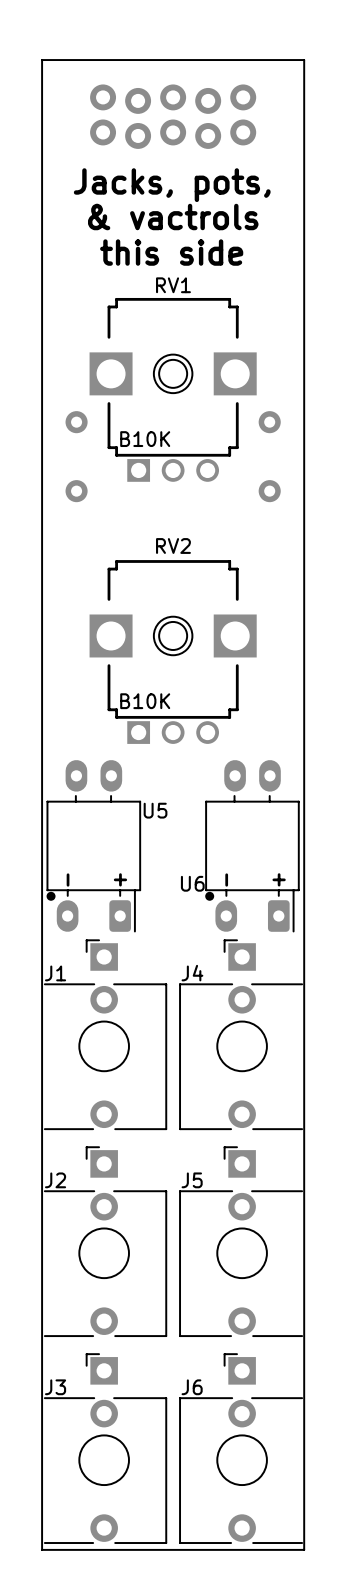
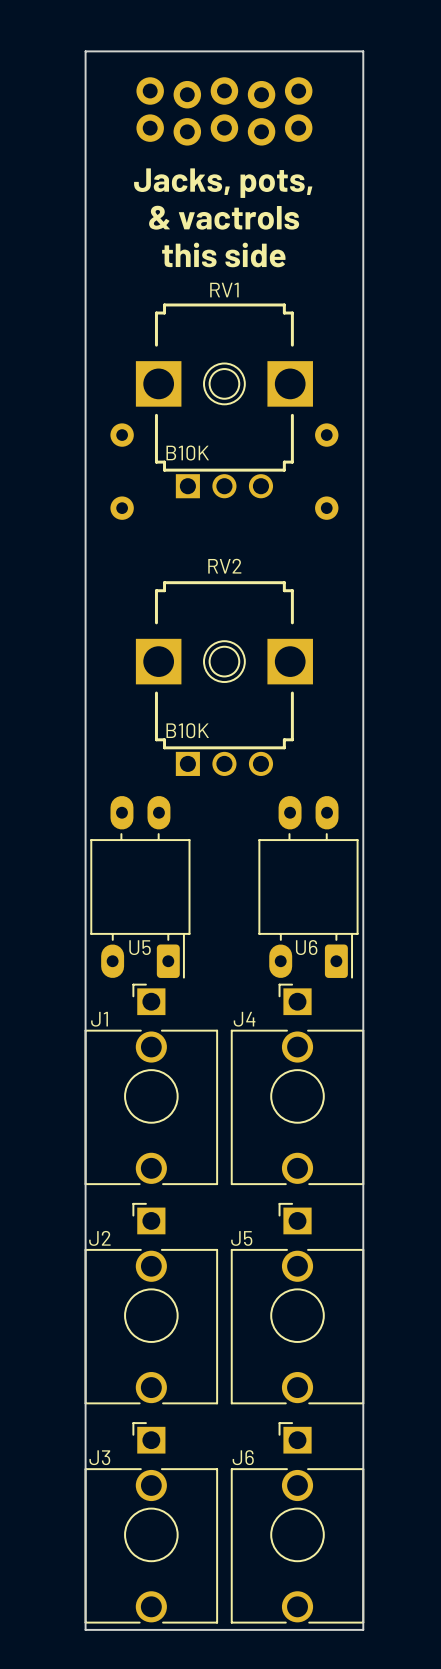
U5 footprint: [46, 760, 141, 933] -> [90, 796, 191, 979]
U6 footprint: [205, 760, 300, 933] -> [258, 796, 359, 979]
U5 name position: U5 (155, 810) -> U5 (140, 947)
U6 name position: U6 (192, 883) -> U6 (306, 947)
J1 footprint: [44, 939, 168, 1130] -> [84, 983, 219, 1186]
J4 footprint: [179, 939, 303, 1130] -> [230, 983, 365, 1186]
J2 footprint: [44, 1146, 168, 1337] -> [84, 1202, 219, 1405]
J5 footprint: [179, 1146, 303, 1337] -> [230, 1202, 365, 1405]
J3 footprint: [44, 1353, 168, 1544] -> [84, 1422, 219, 1624]
J6 footprint: [179, 1353, 303, 1544] -> [230, 1422, 365, 1624]

